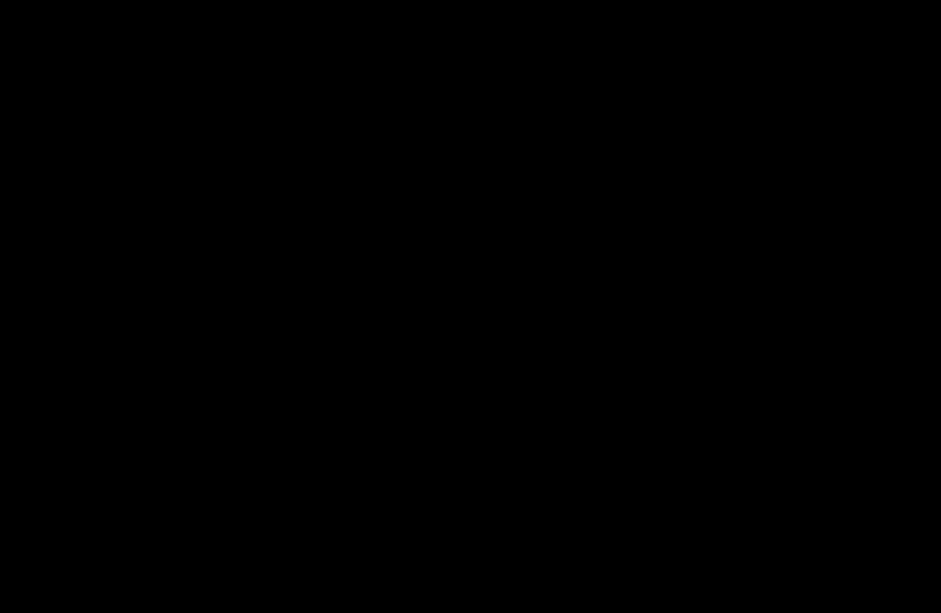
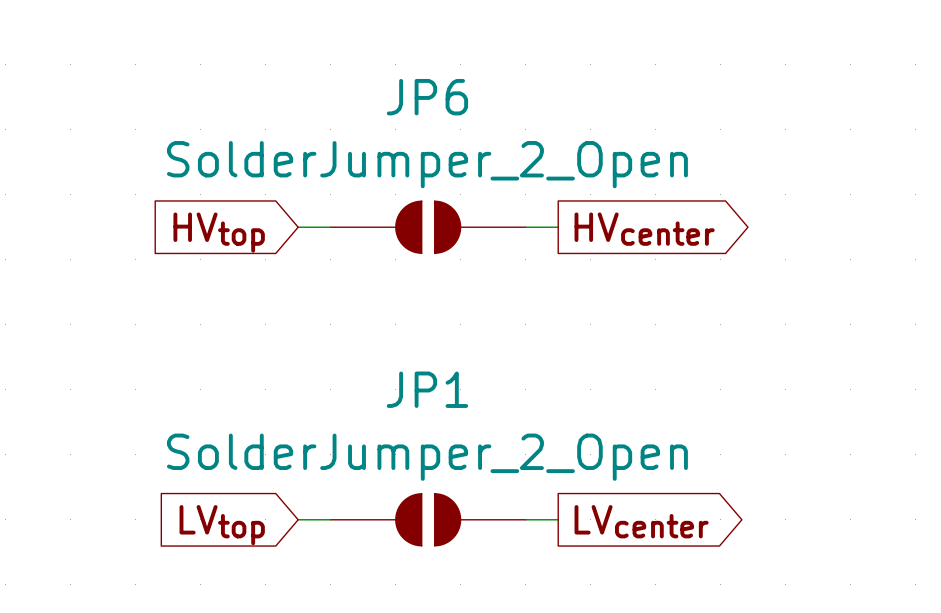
wire: none -> (298, 227) (330, 227)
JP6: none -> SolderJumper_2_Open (428, 227)
wire: none -> (525, 227) (558, 227)
global label: none -> HVcenter (644, 229)
global label: none -> HVtop (219, 232)
wire: none -> (298, 519) (330, 519)
JP1: none -> SolderJumper_2_Open (428, 519)
wire: none -> (525, 519) (558, 519)
global label: none -> LVcenter (641, 521)
global label: none -> LVtop (222, 525)

